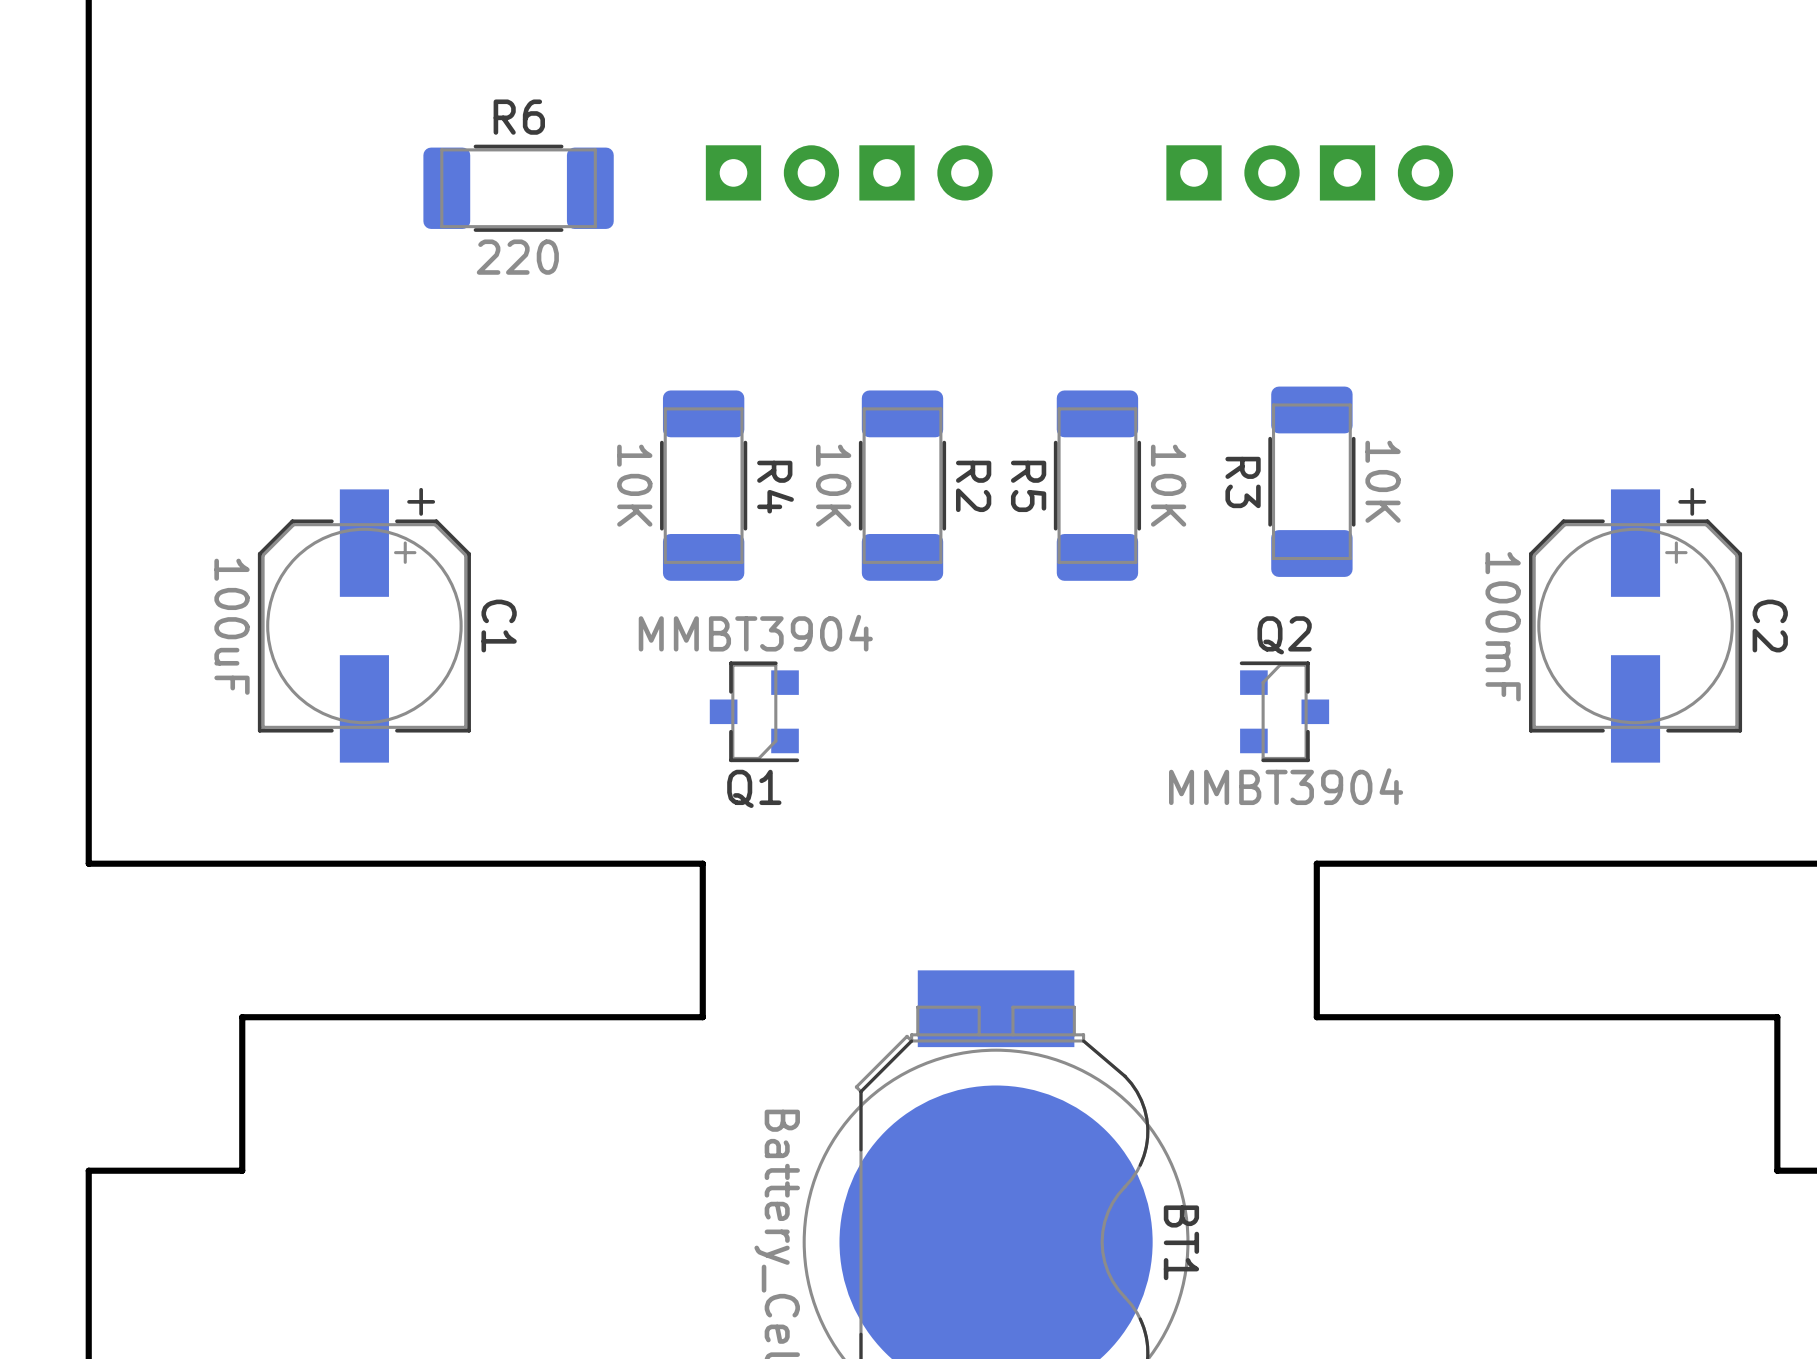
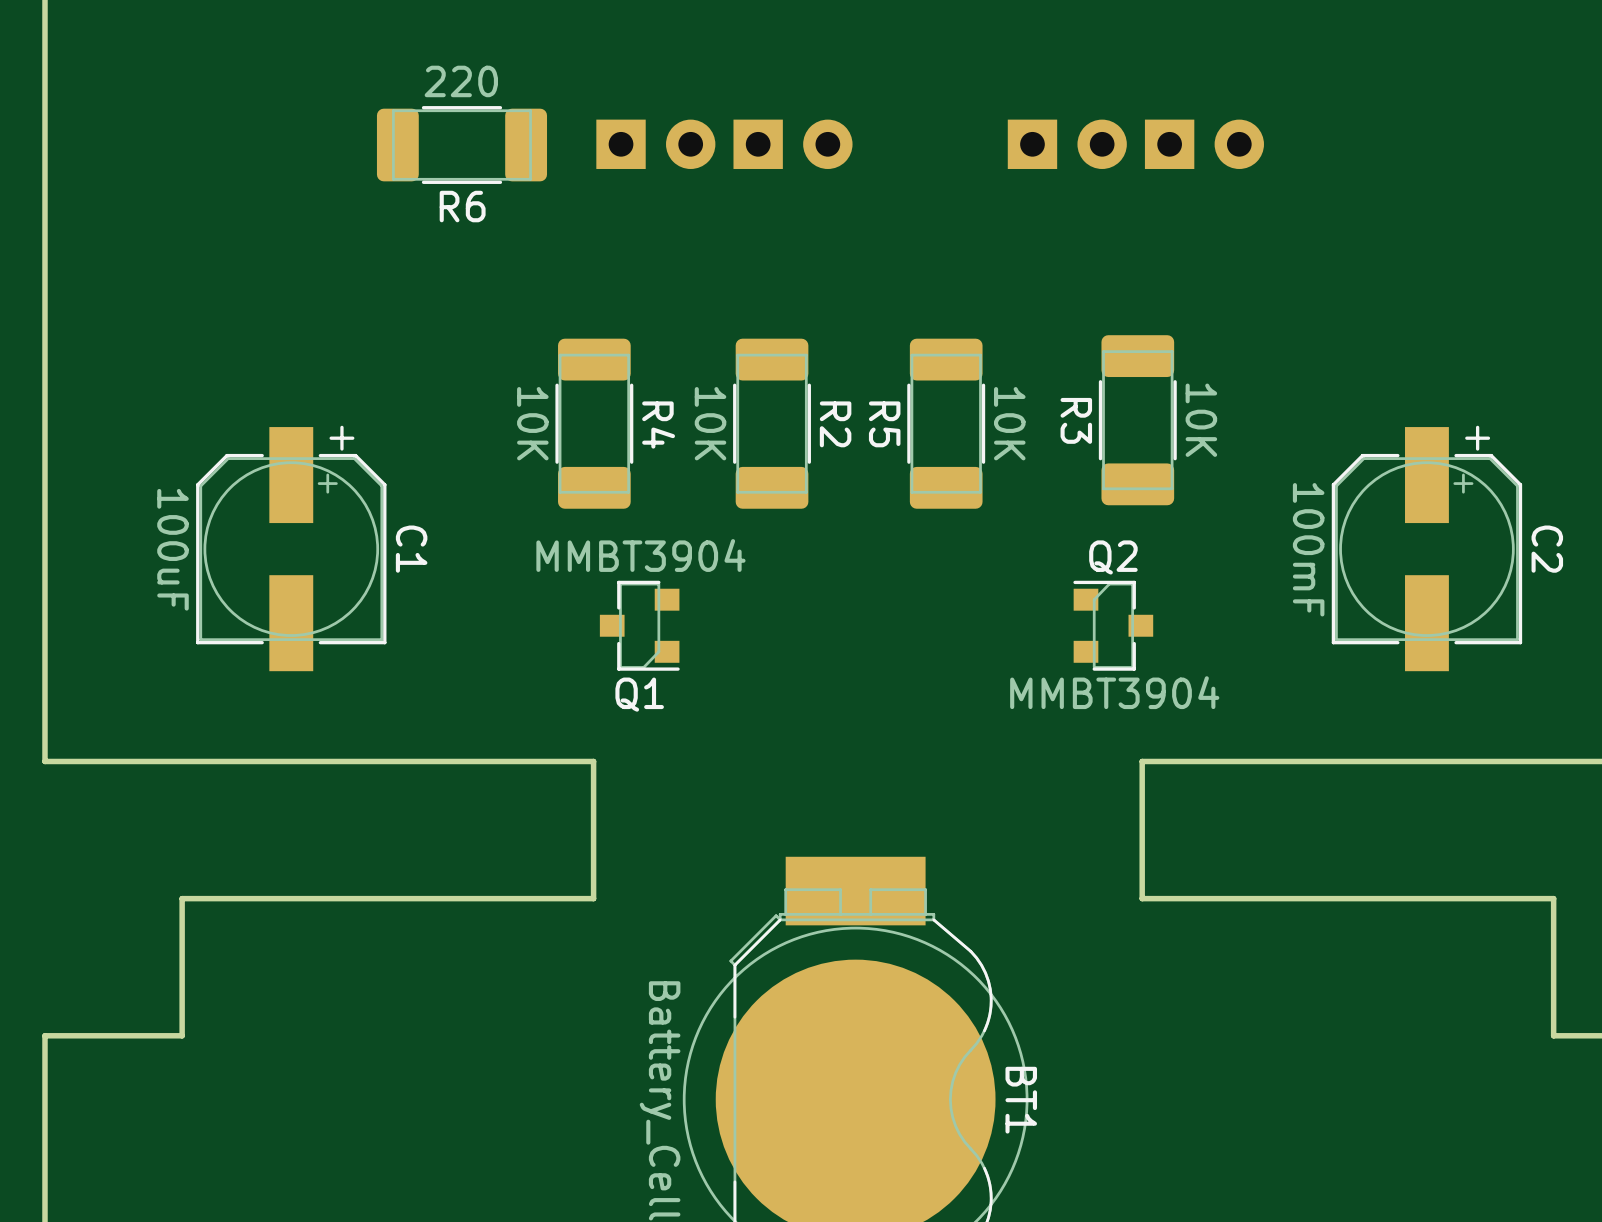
R6 name position: R6 (519, 117) -> R6 (462, 206)
R6 position: (518, 188) -> (461, 145)
R6 value position: 220 (517, 257) -> 220 (461, 81)

